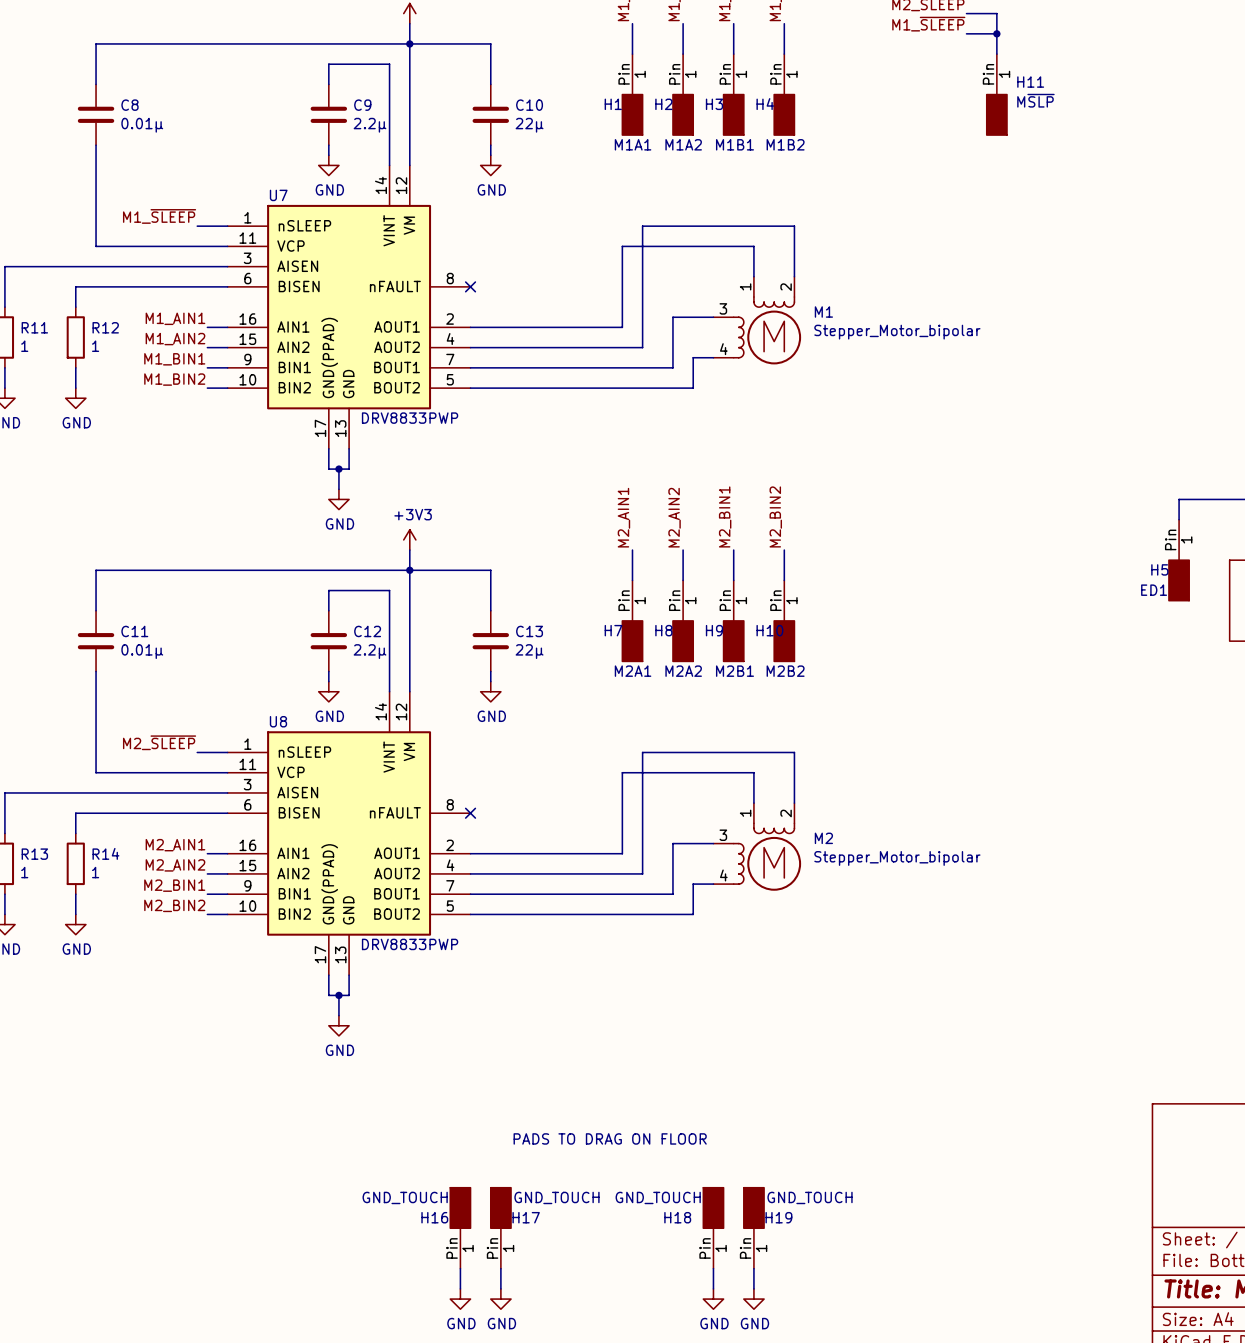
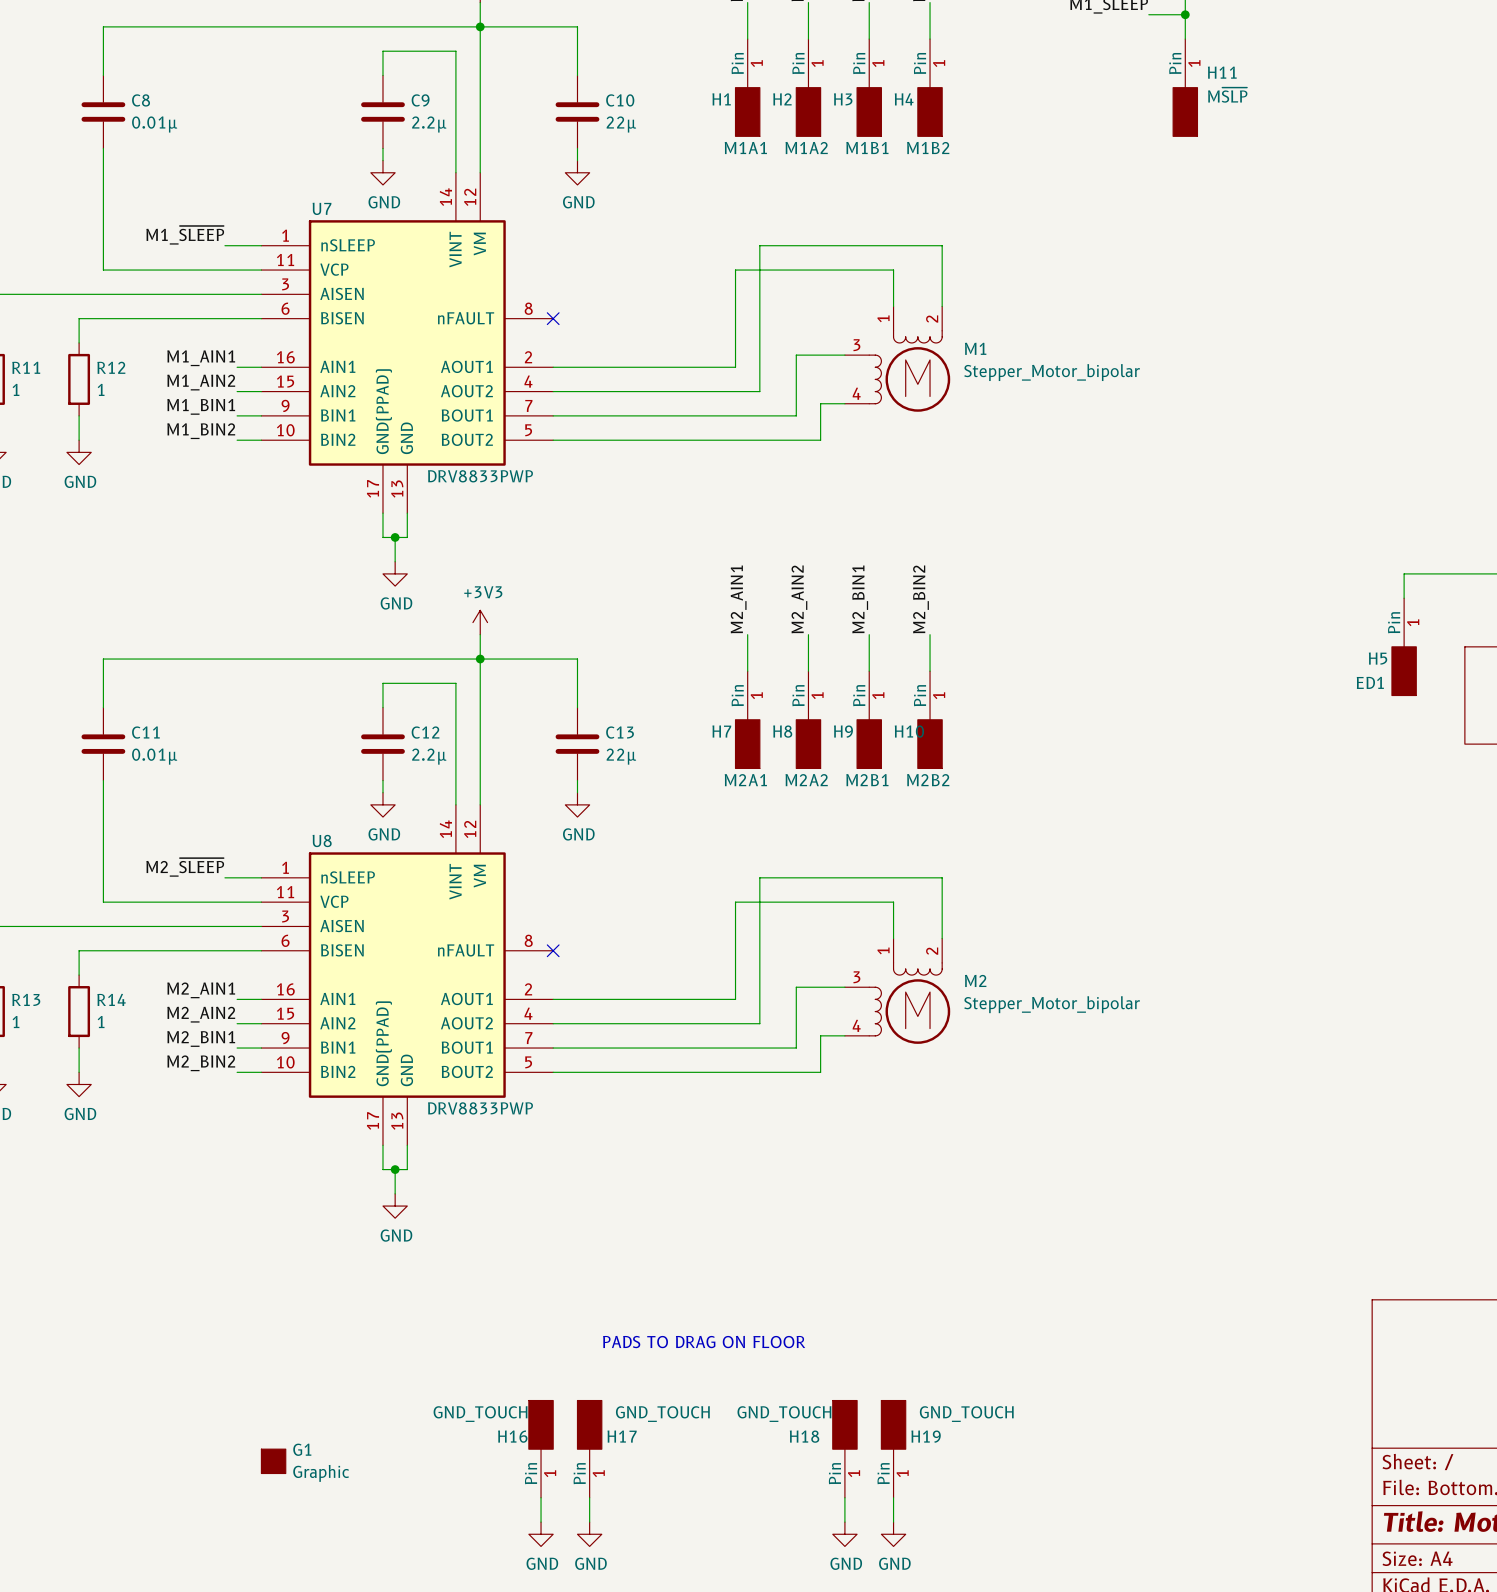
G1: none -> Graphic (273, 1461)

